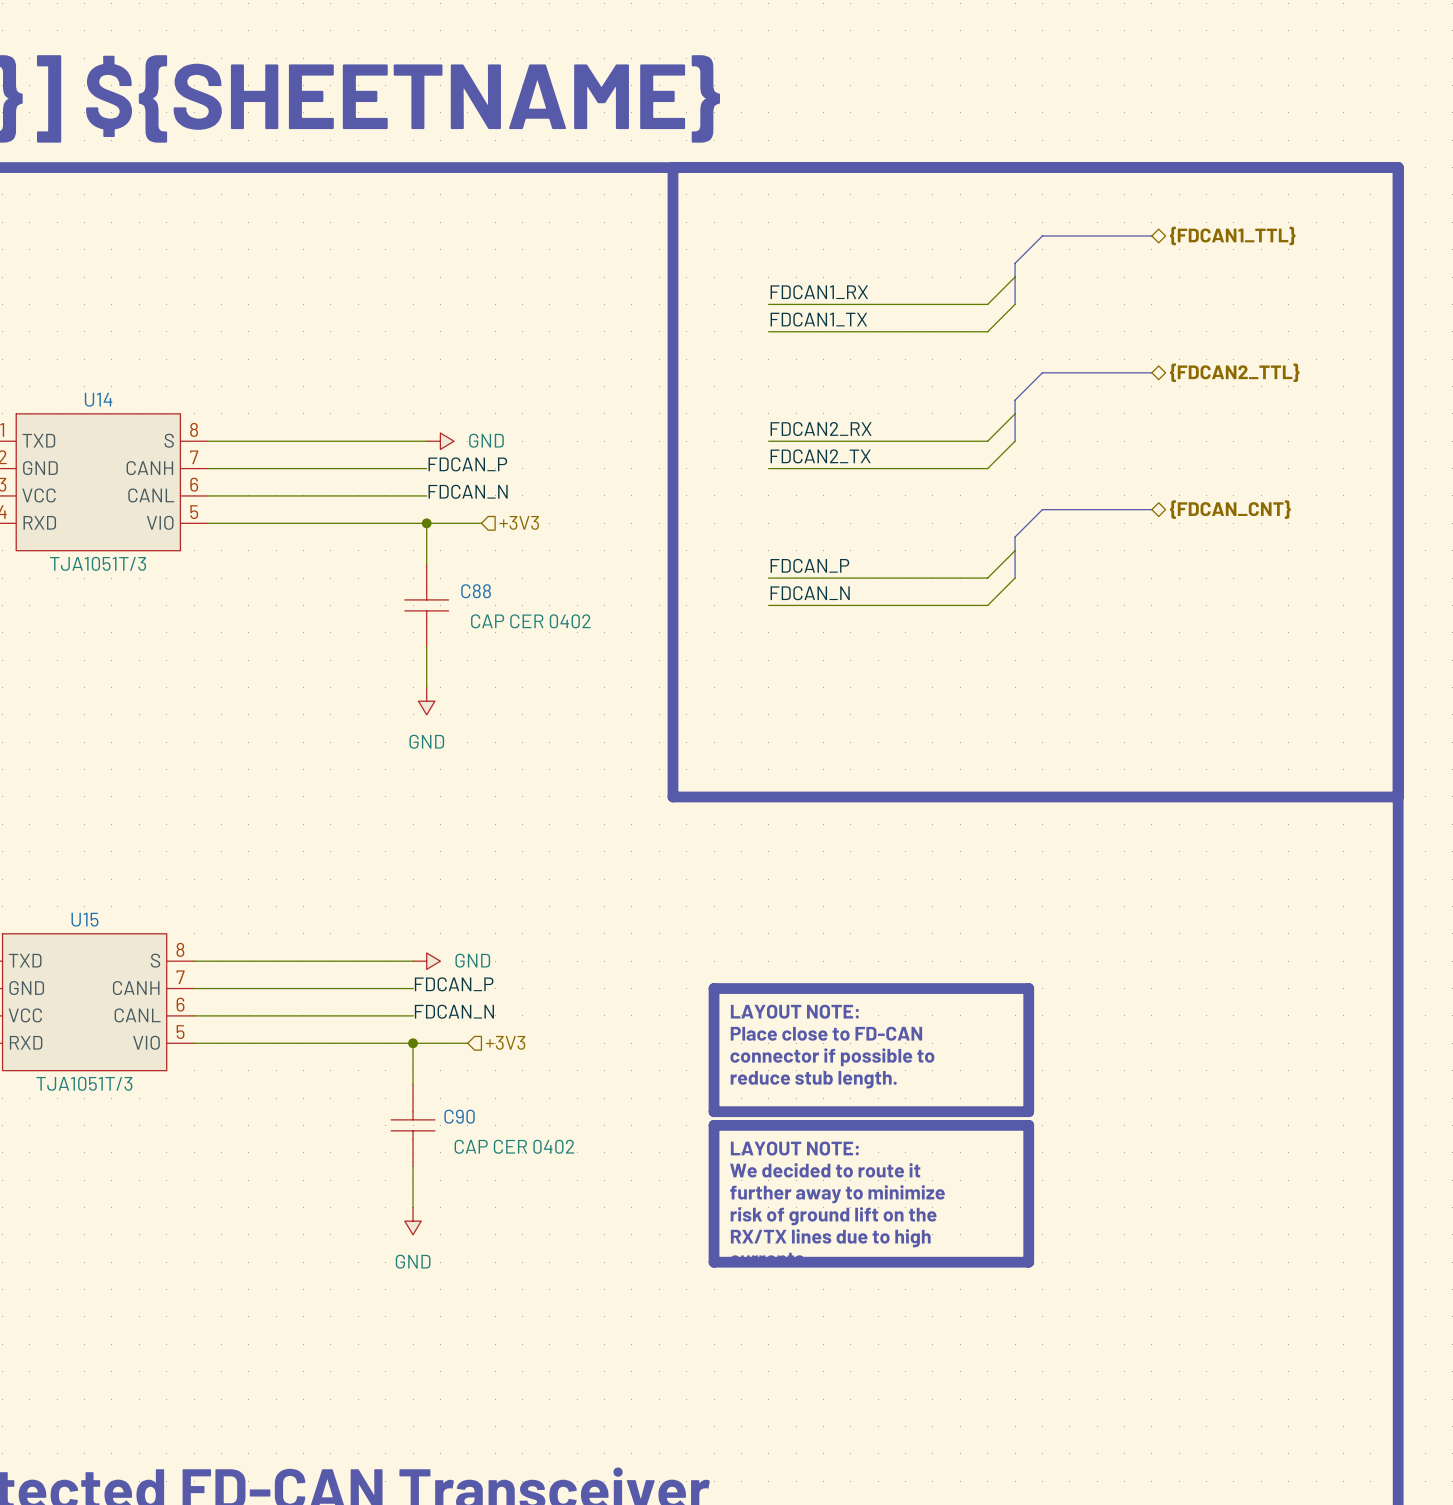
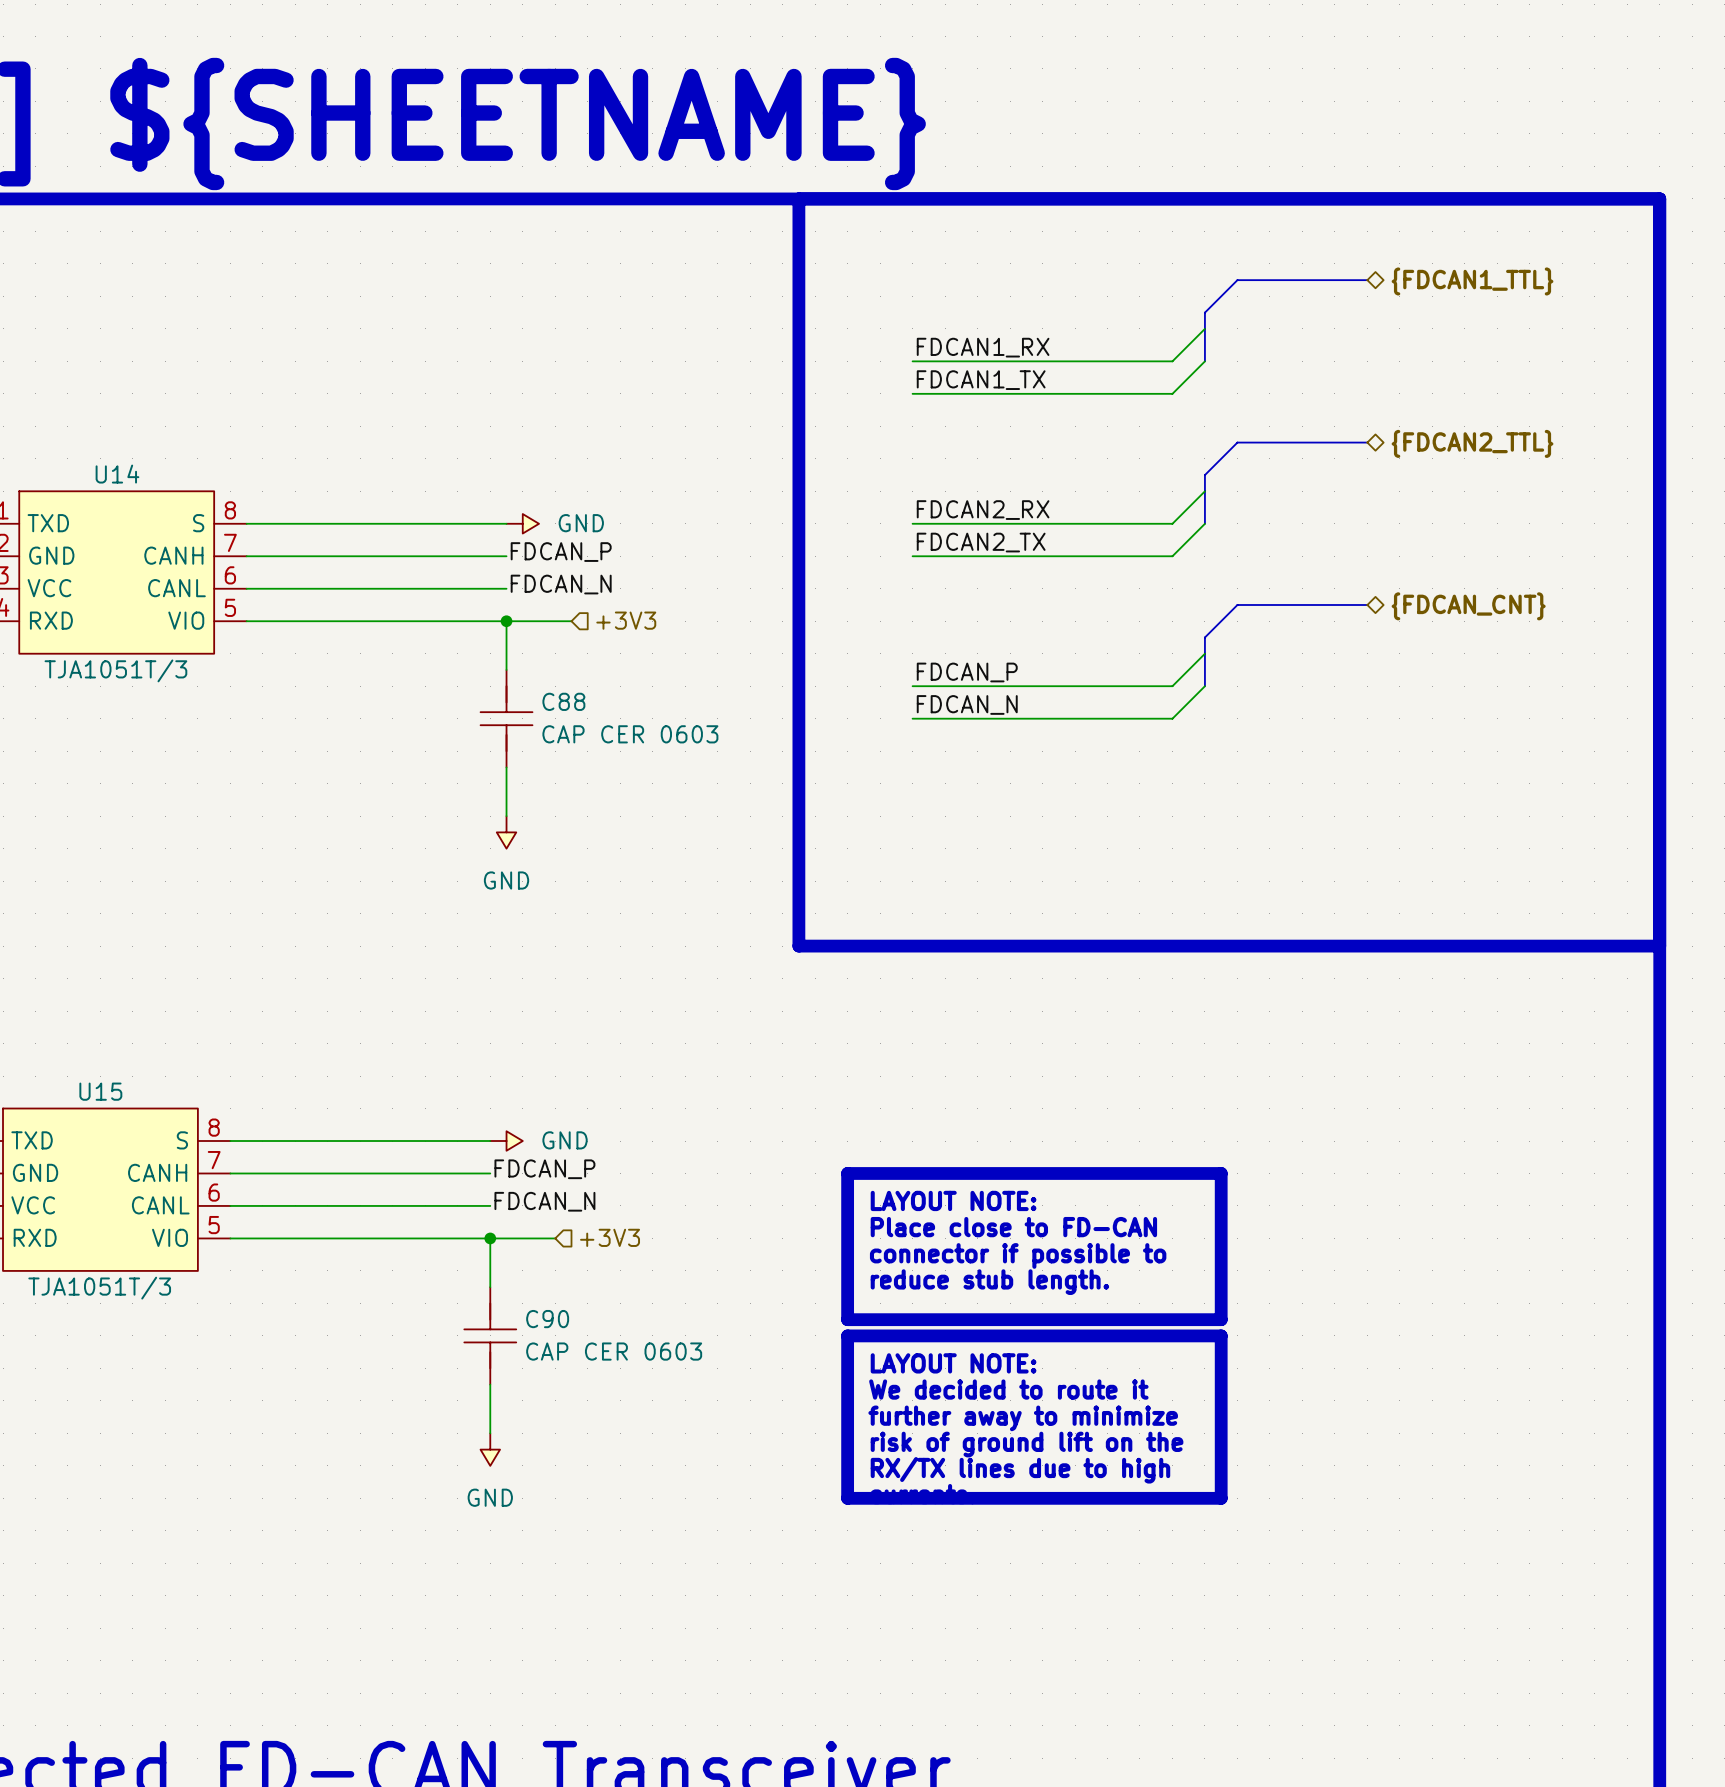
C88 symbol: [404, 564, 449, 647] -> [480, 669, 533, 768]
C88 value: CAP CER 0402 (530, 621) -> CAP CER 0603 (630, 734)
C90 symbol: [391, 1084, 435, 1167] -> [464, 1287, 517, 1385]
C90 value: CAP CER 0402 (514, 1146) -> CAP CER 0603 (614, 1351)

